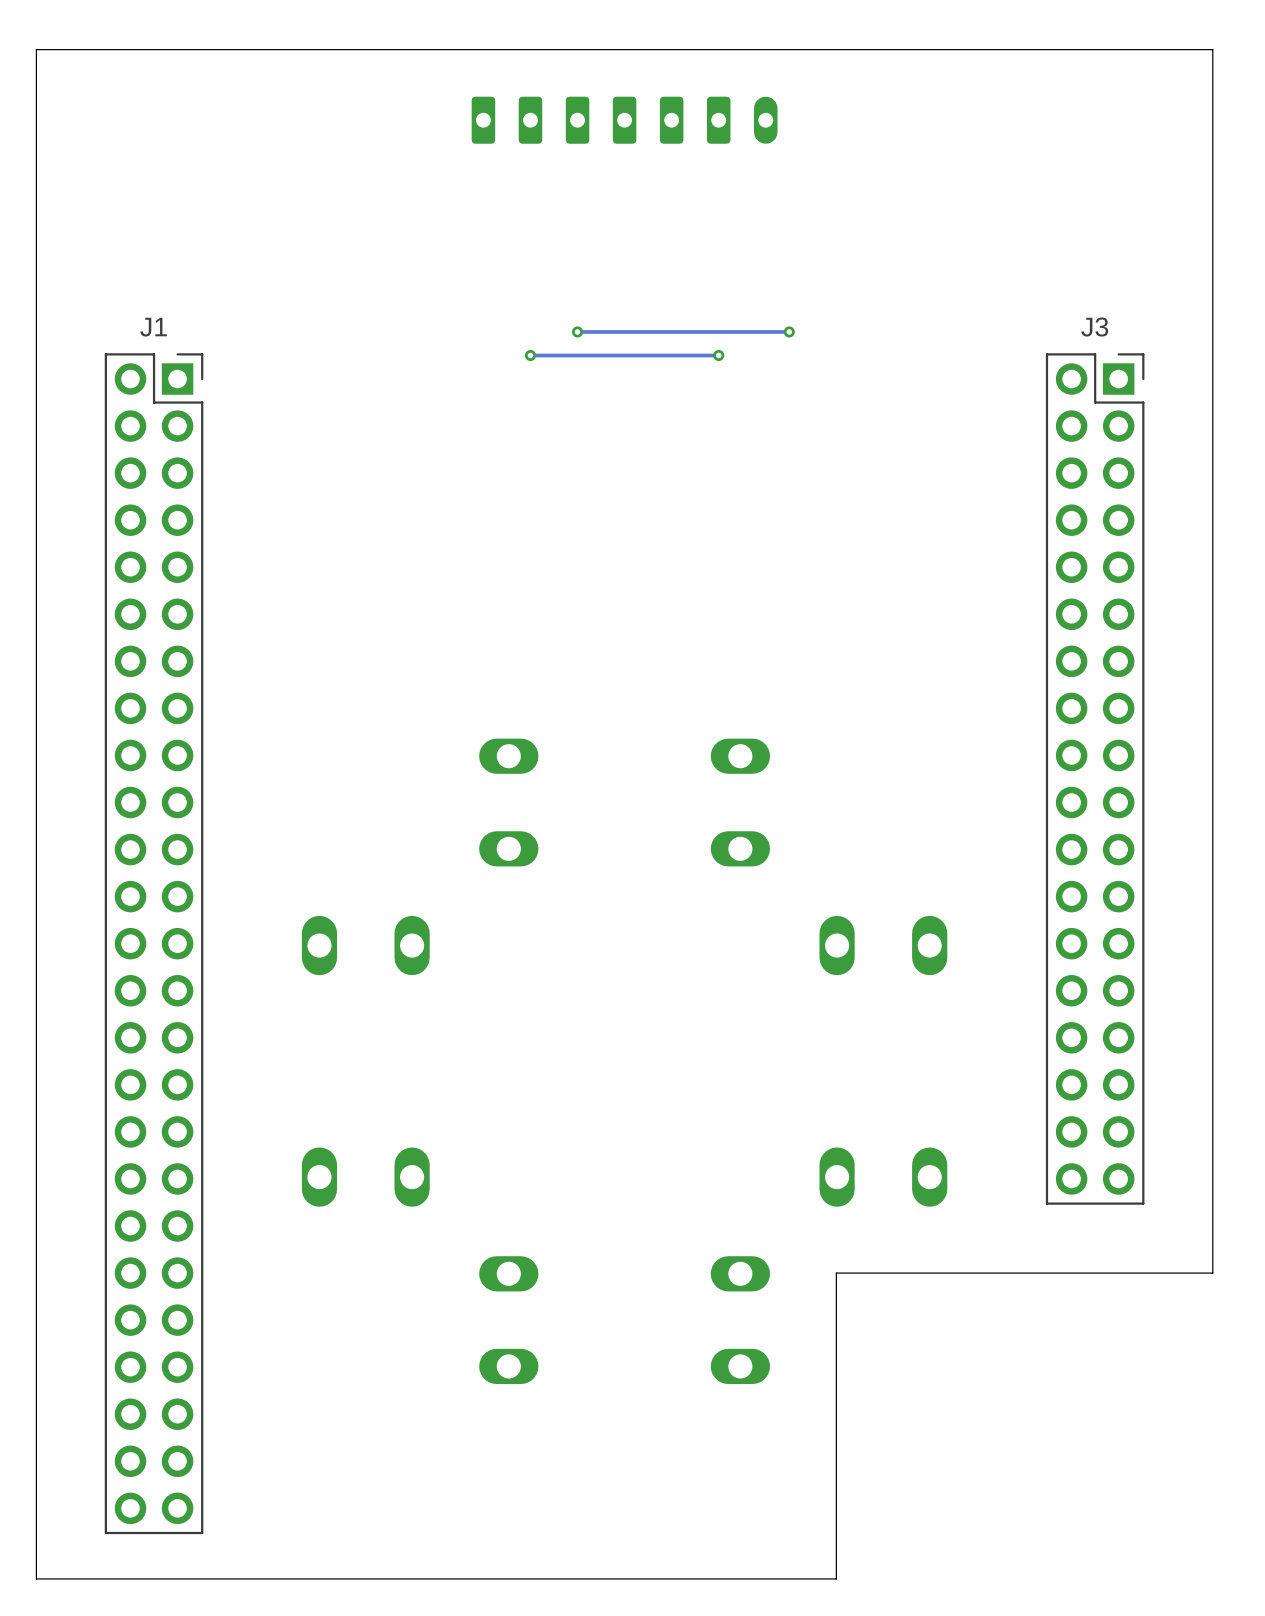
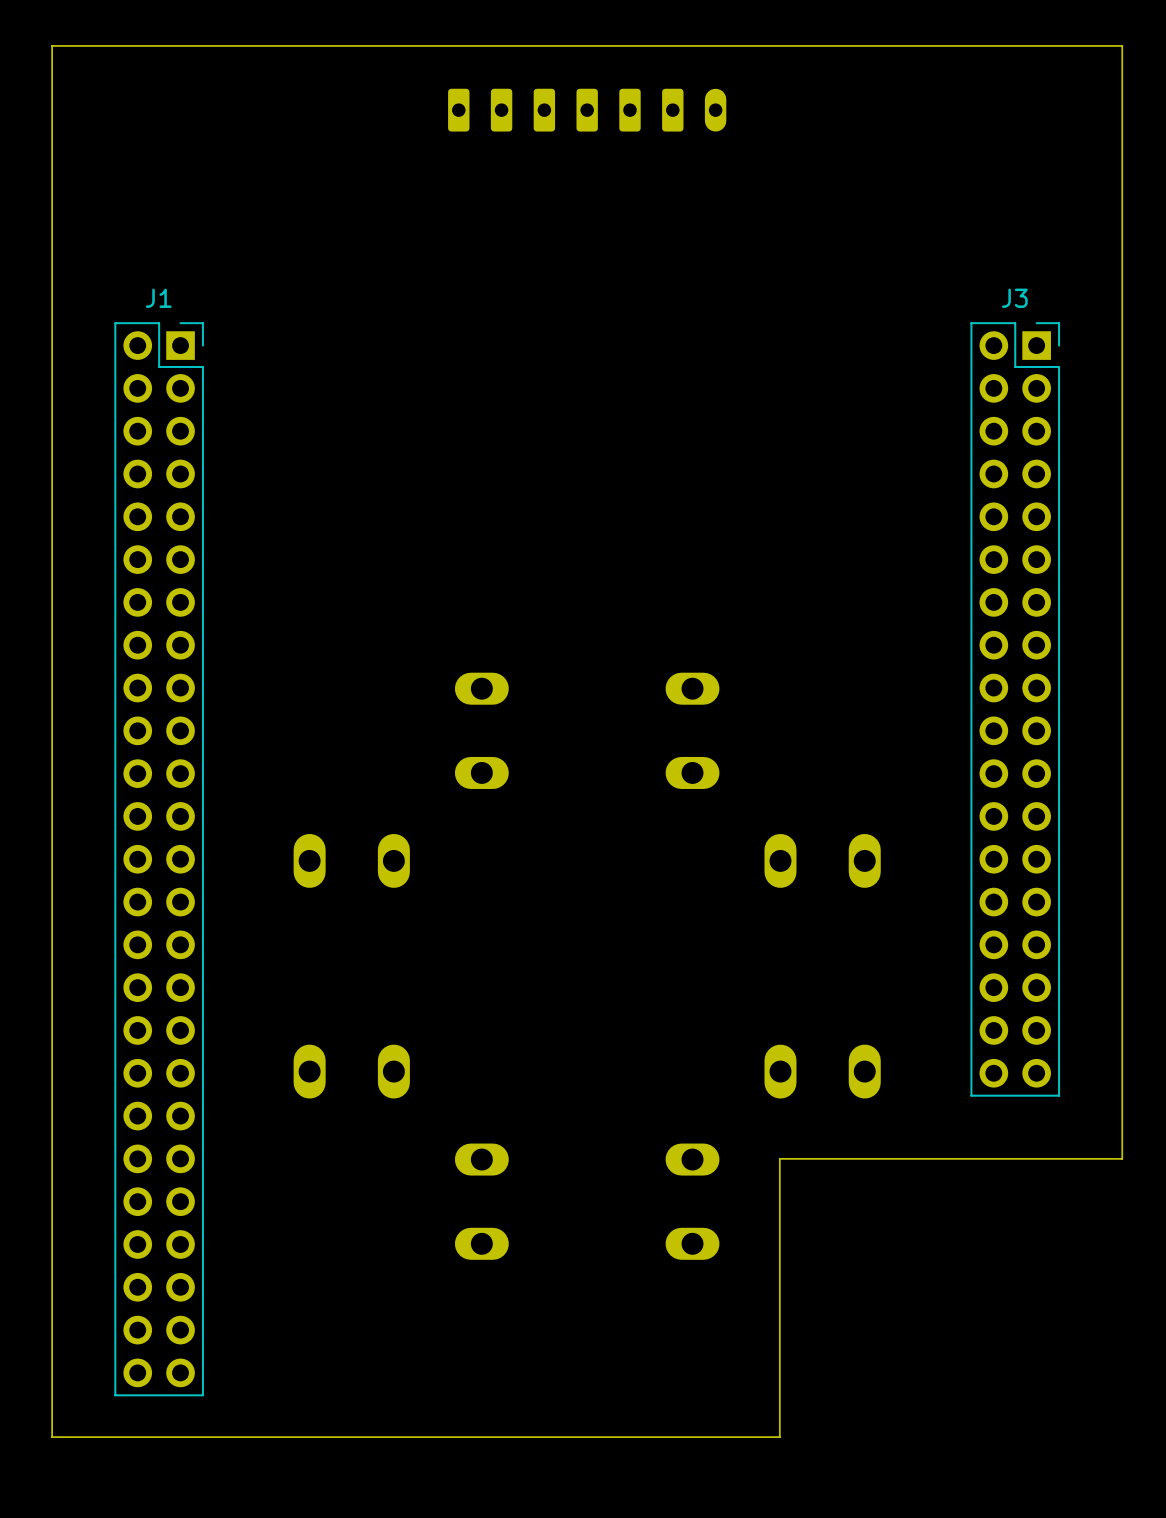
via: (577, 331) -> none
track: (789, 331) (577, 331) -> none
via: (789, 331) -> none
via: (530, 355) -> none
track: (718, 355) (530, 355) -> none
via: (718, 355) -> none

